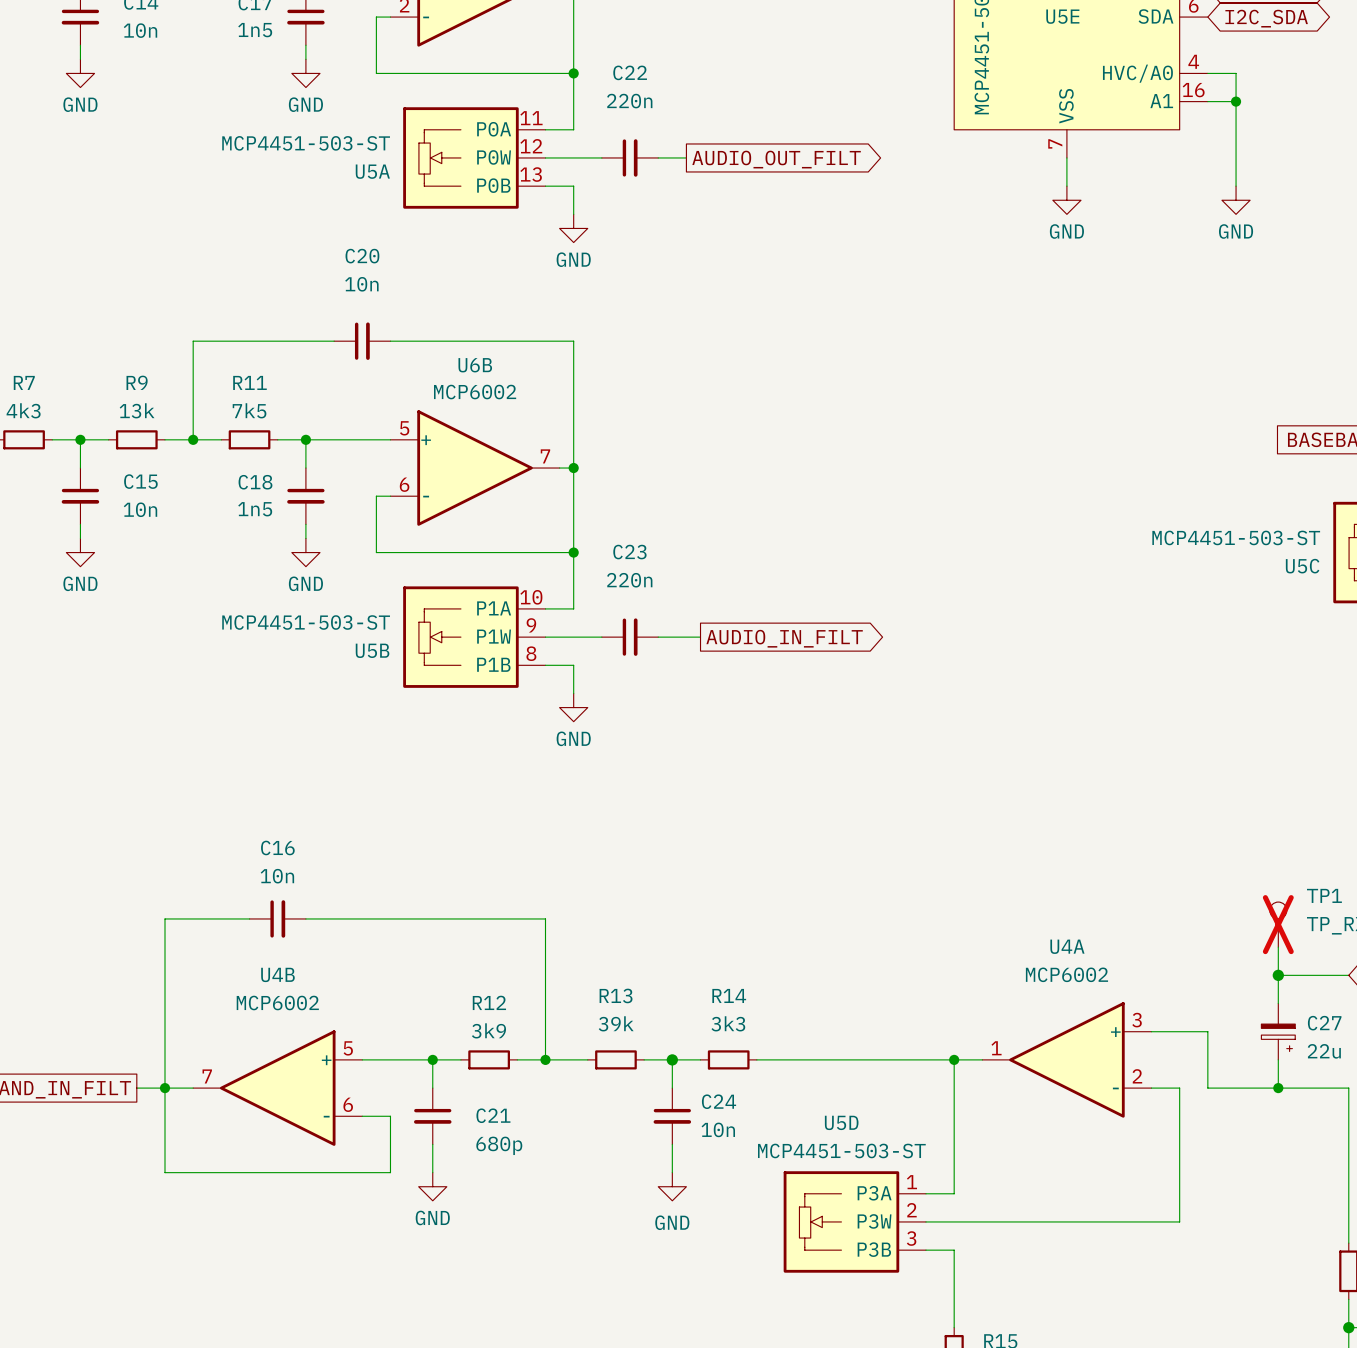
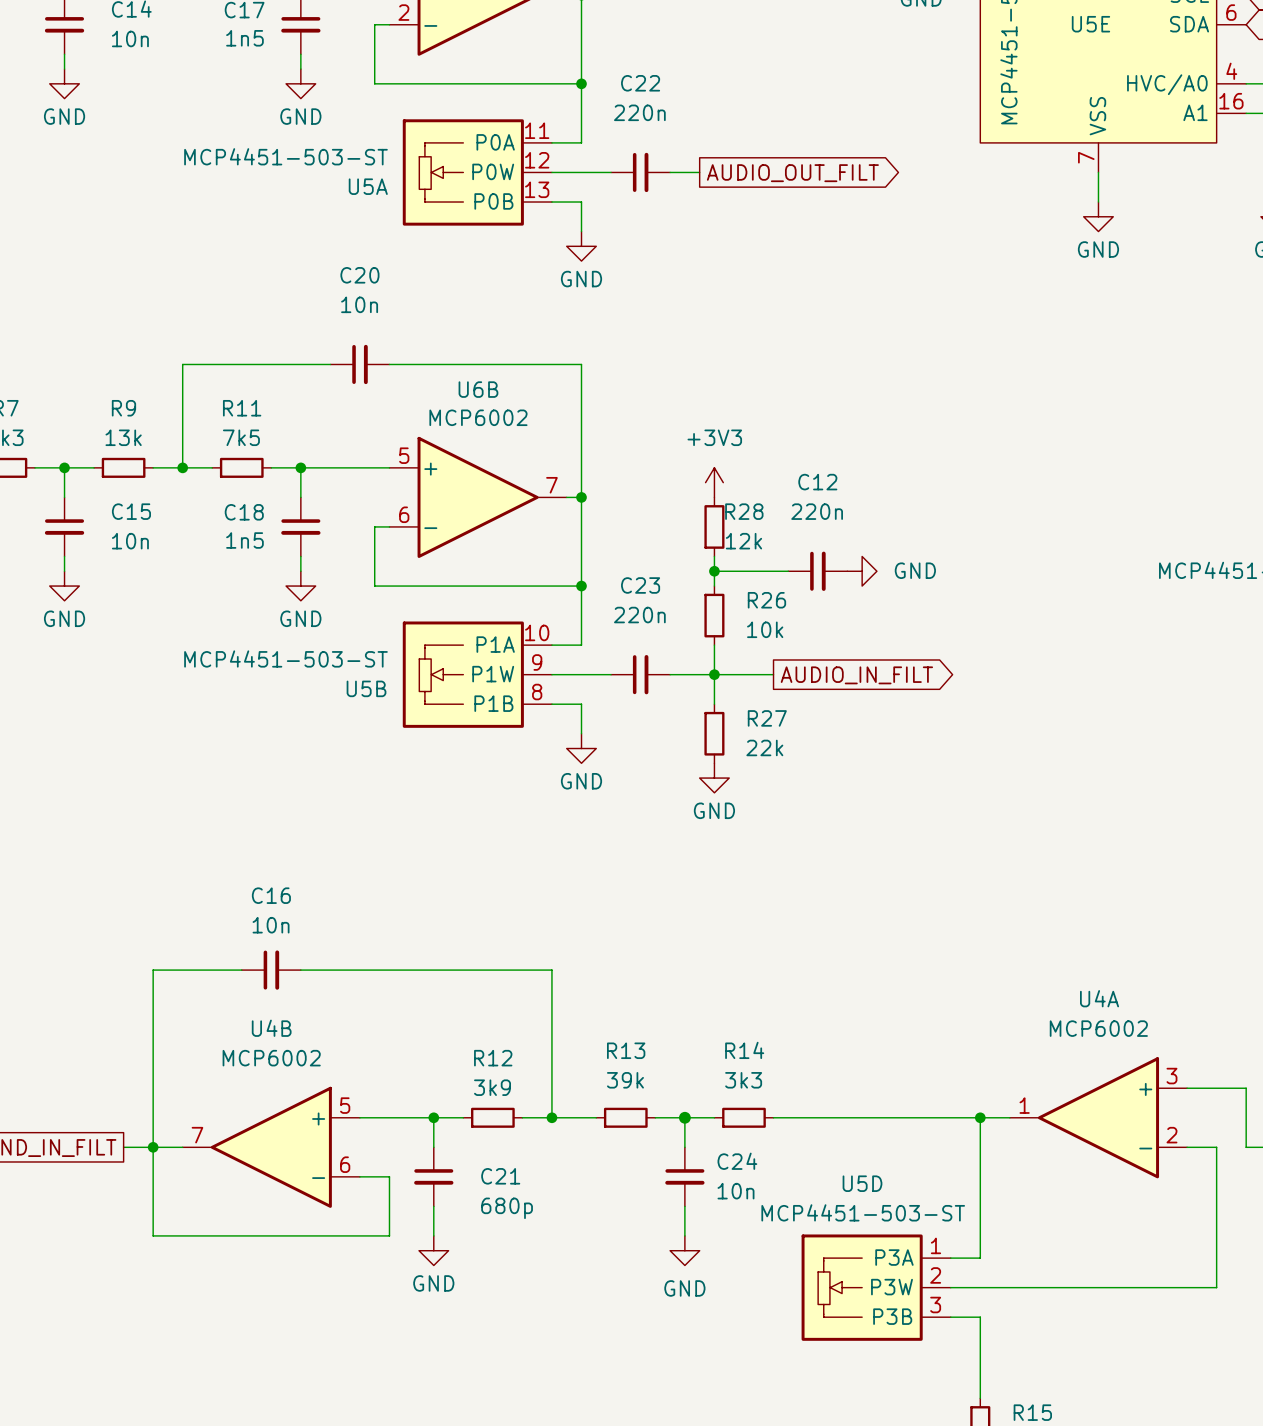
power symbol: none -> +3V3 (714, 482)
R28: none -> 12k (714, 526)
wire: none -> (714, 556) (714, 586)
wire: none -> (714, 571) (788, 571)
junction: none -> (714, 571)
C12: none -> 220n (817, 571)
power symbol: none -> GND (862, 571)
R26: none -> 10k (714, 615)
wire: none -> (714, 645) (714, 704)
wire: none -> (714, 674) (773, 674)
junction: none -> (714, 674)
global label position: AUDIO_IN_FILT (784, 638) -> AUDIO_IN_FILT (856, 675)
R27: none -> 22k (714, 733)
power symbol: none -> GND (714, 778)

